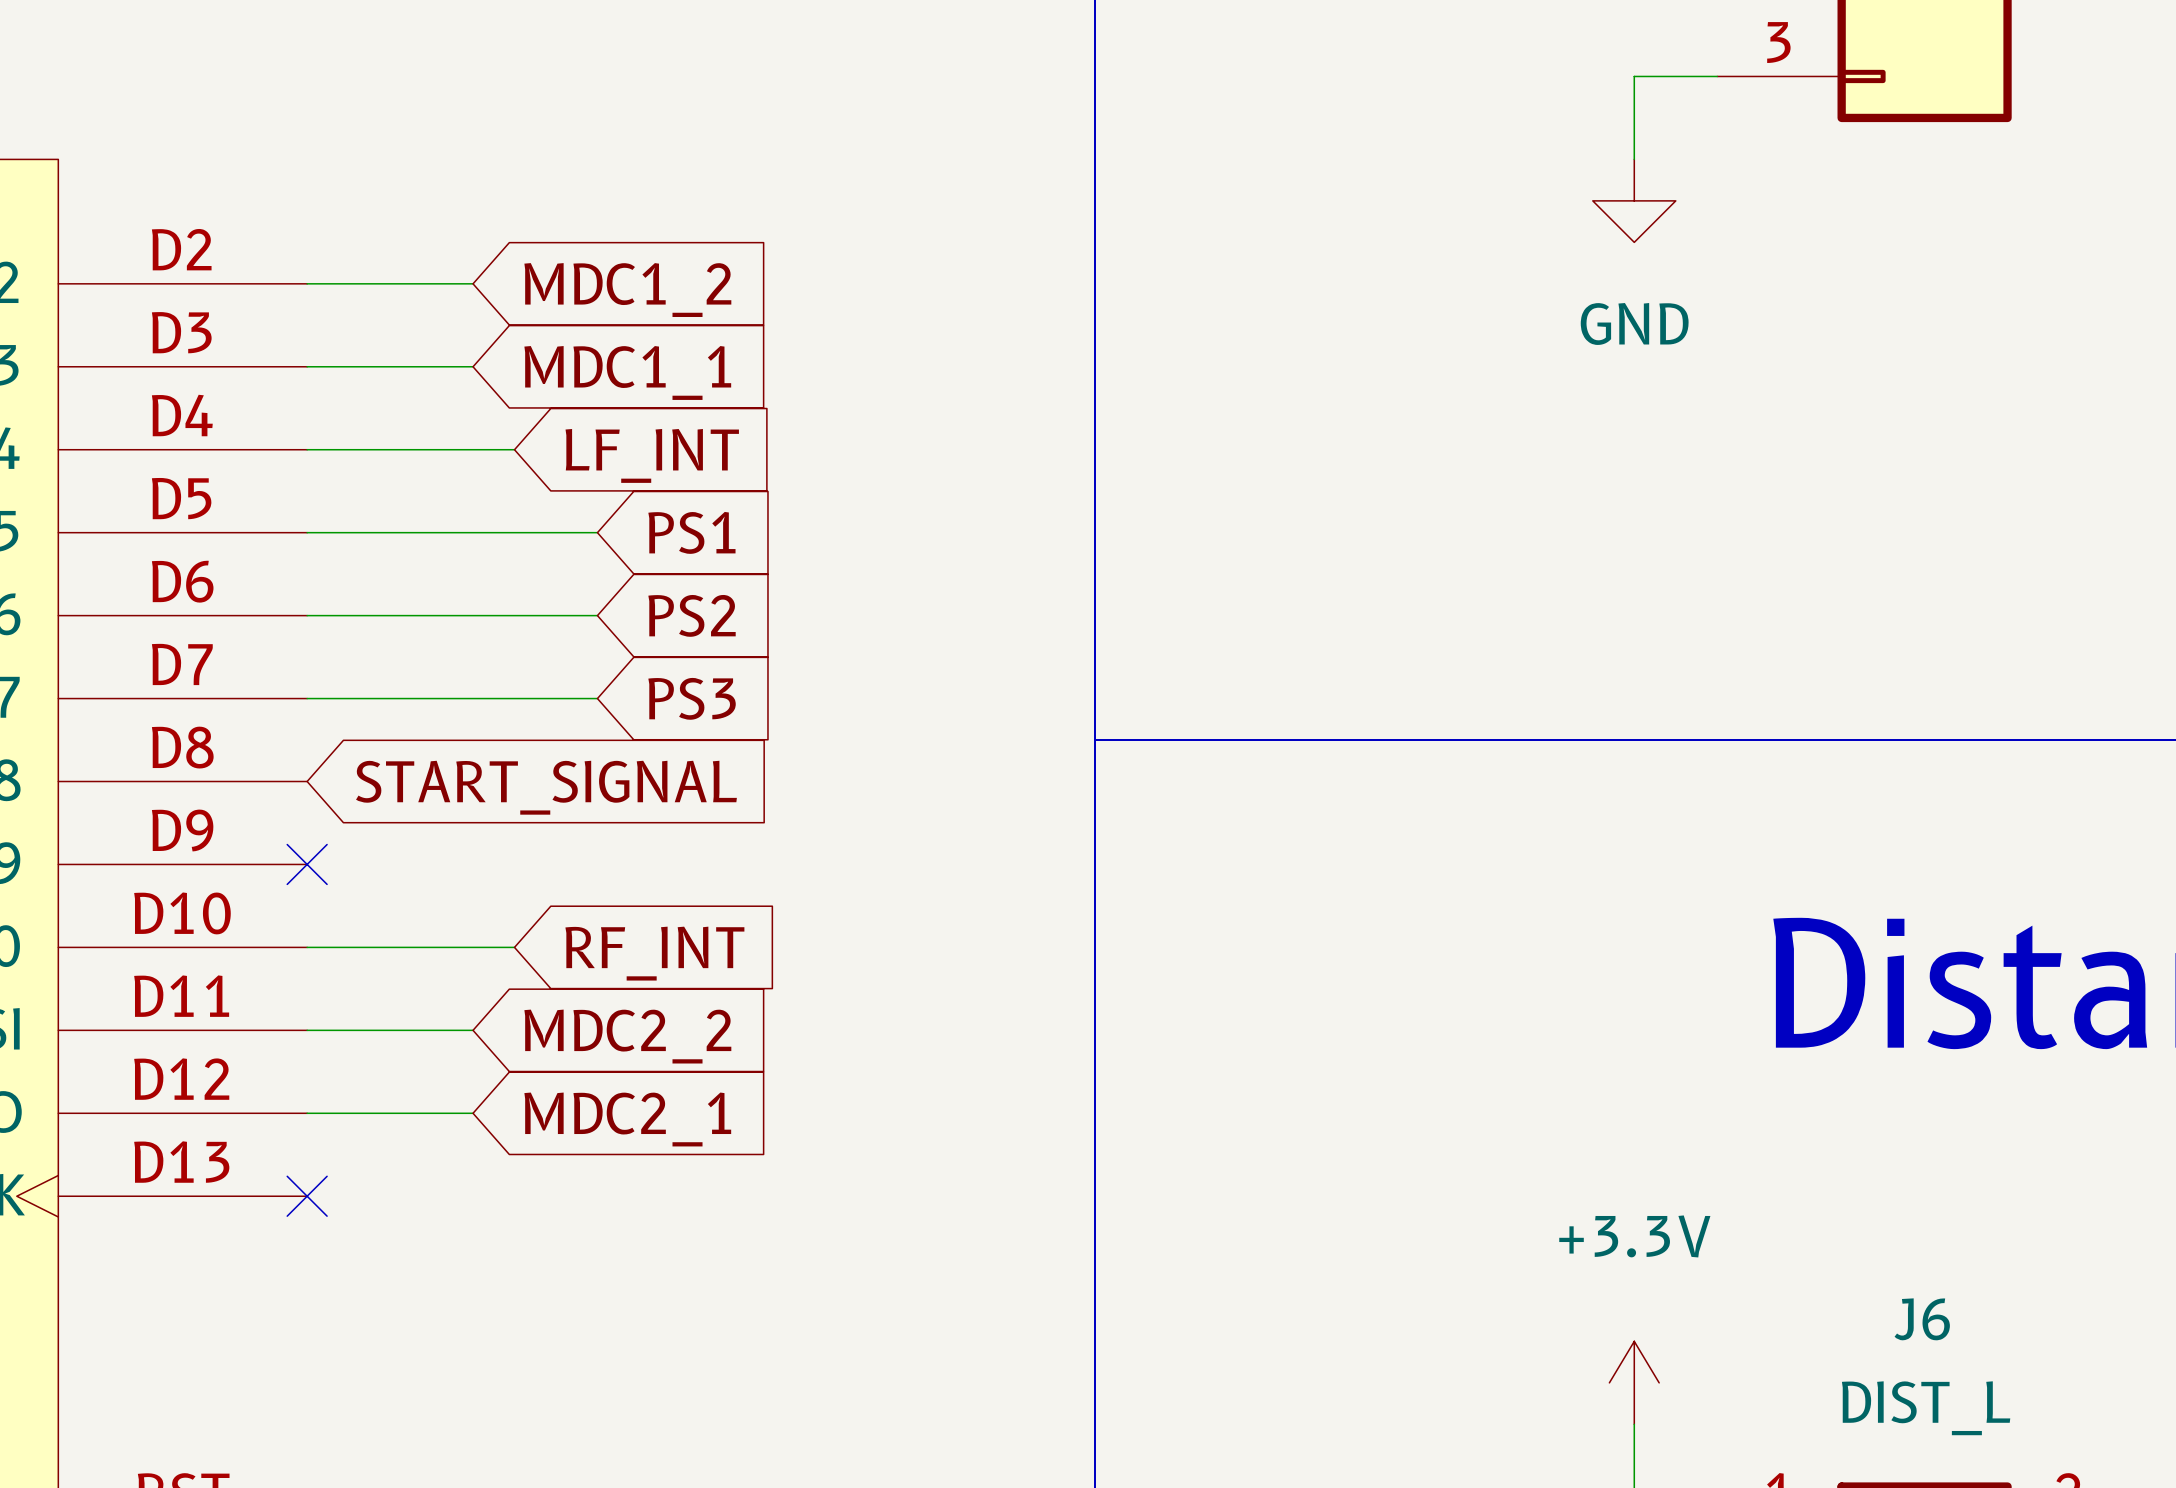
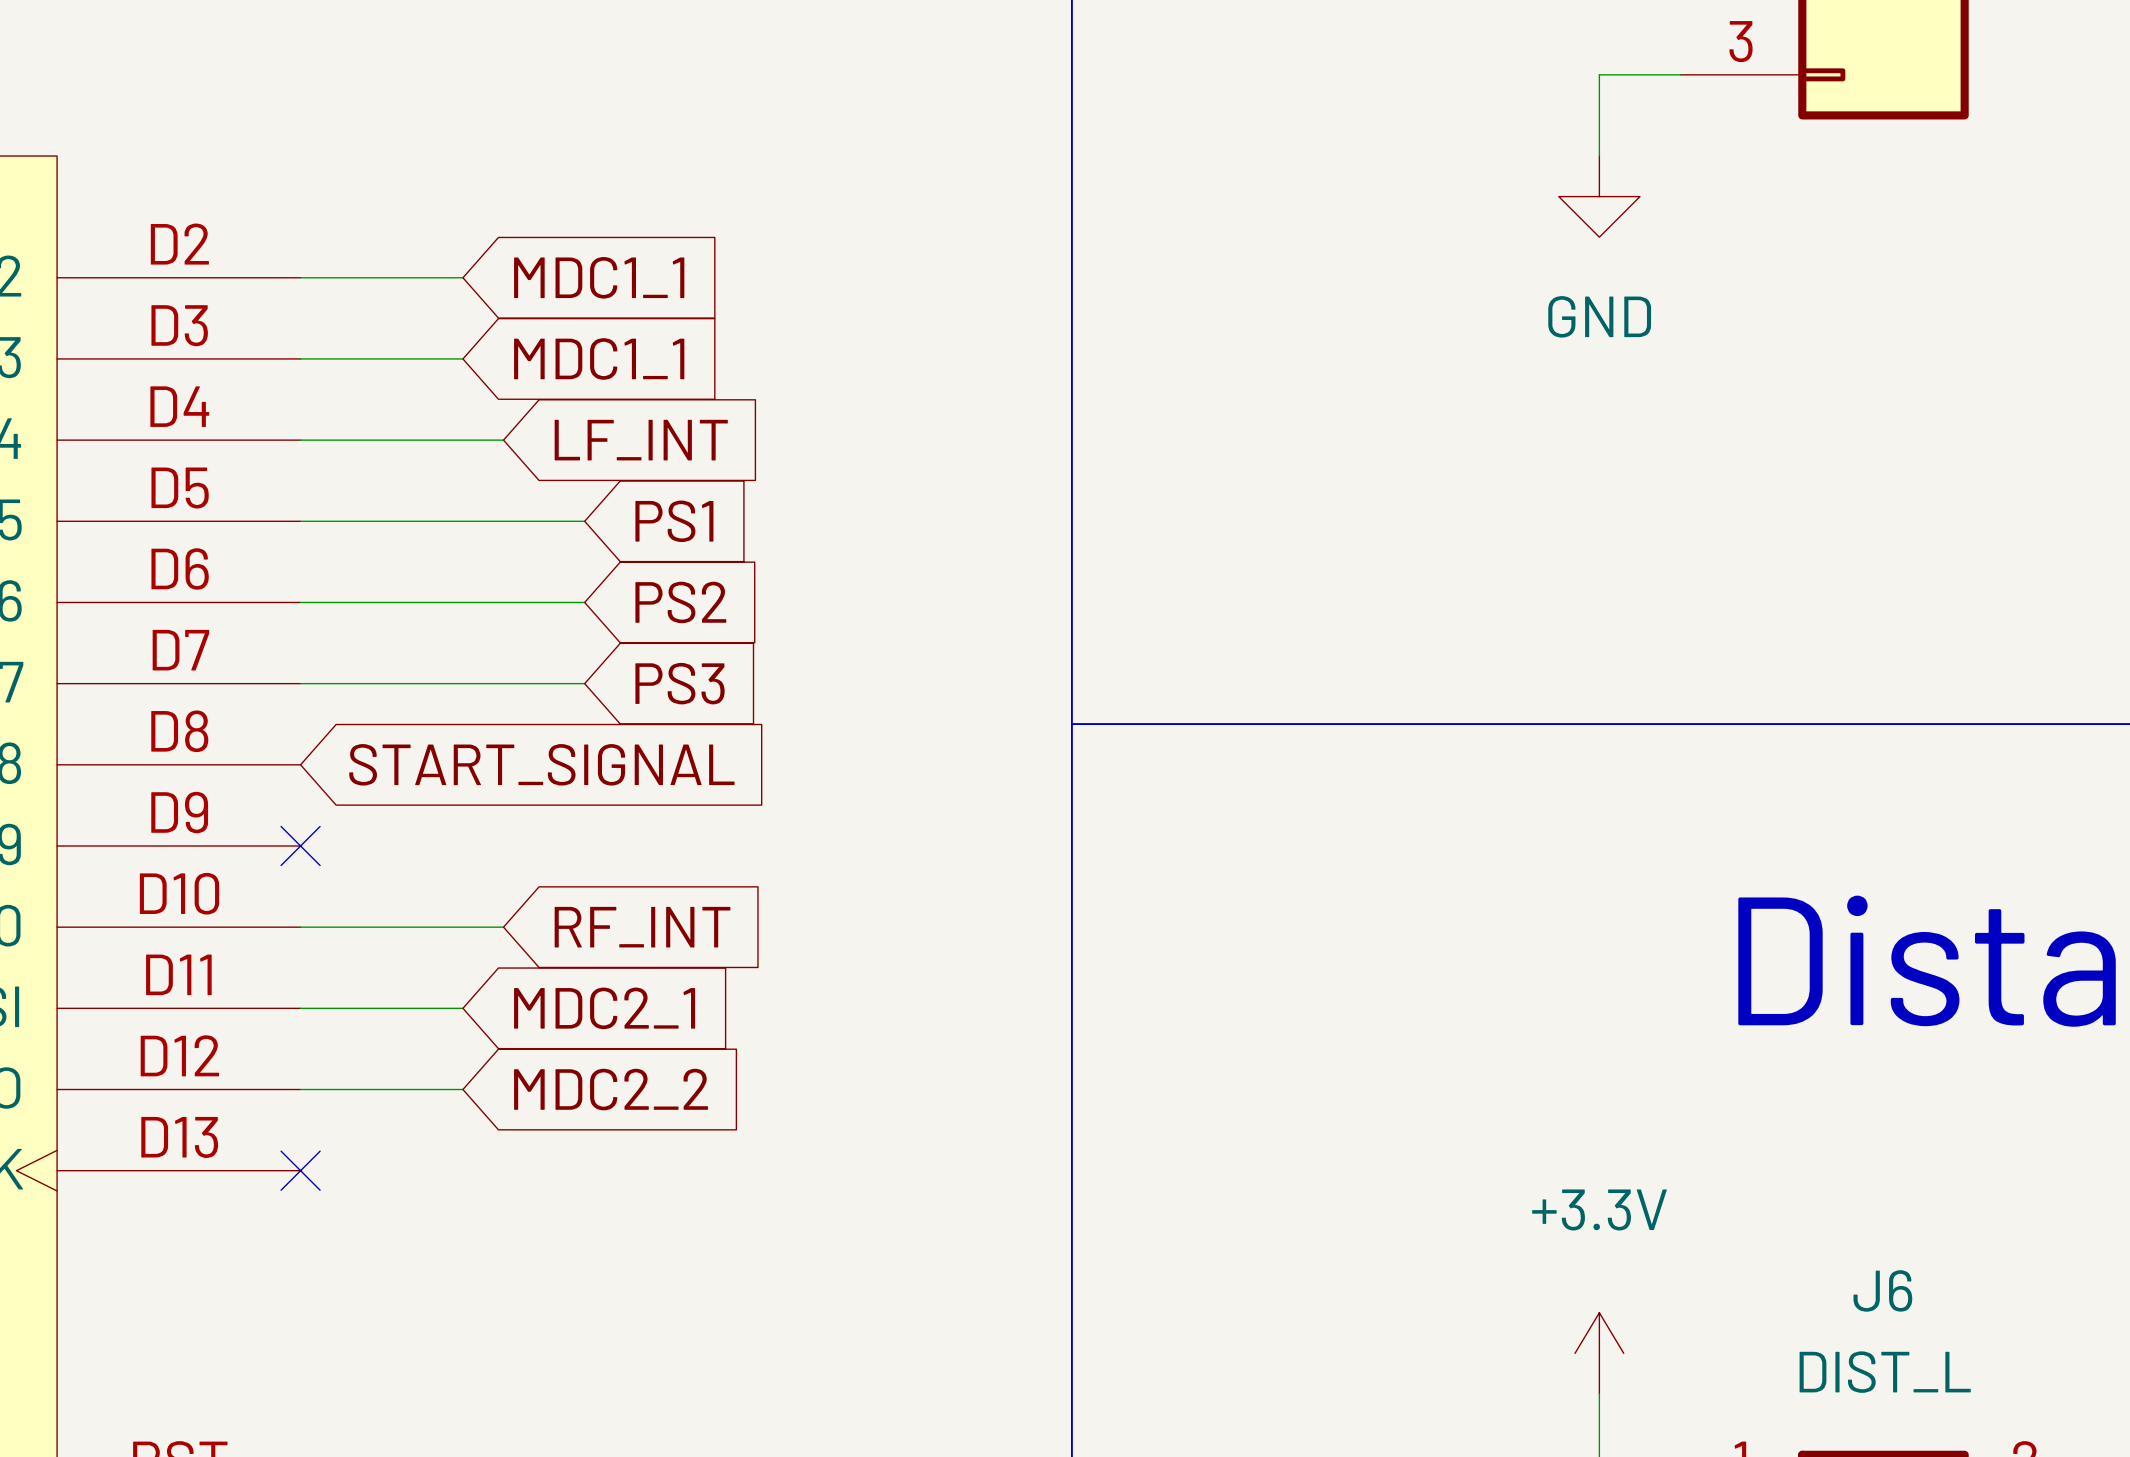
global label: MDC1_2 (627, 290) -> MDC1_1 (599, 277)
global label: MDC2_2 (627, 1036) -> MDC2_1 (604, 1008)
global label: MDC2_1 (627, 1119) -> MDC2_2 (611, 1089)

